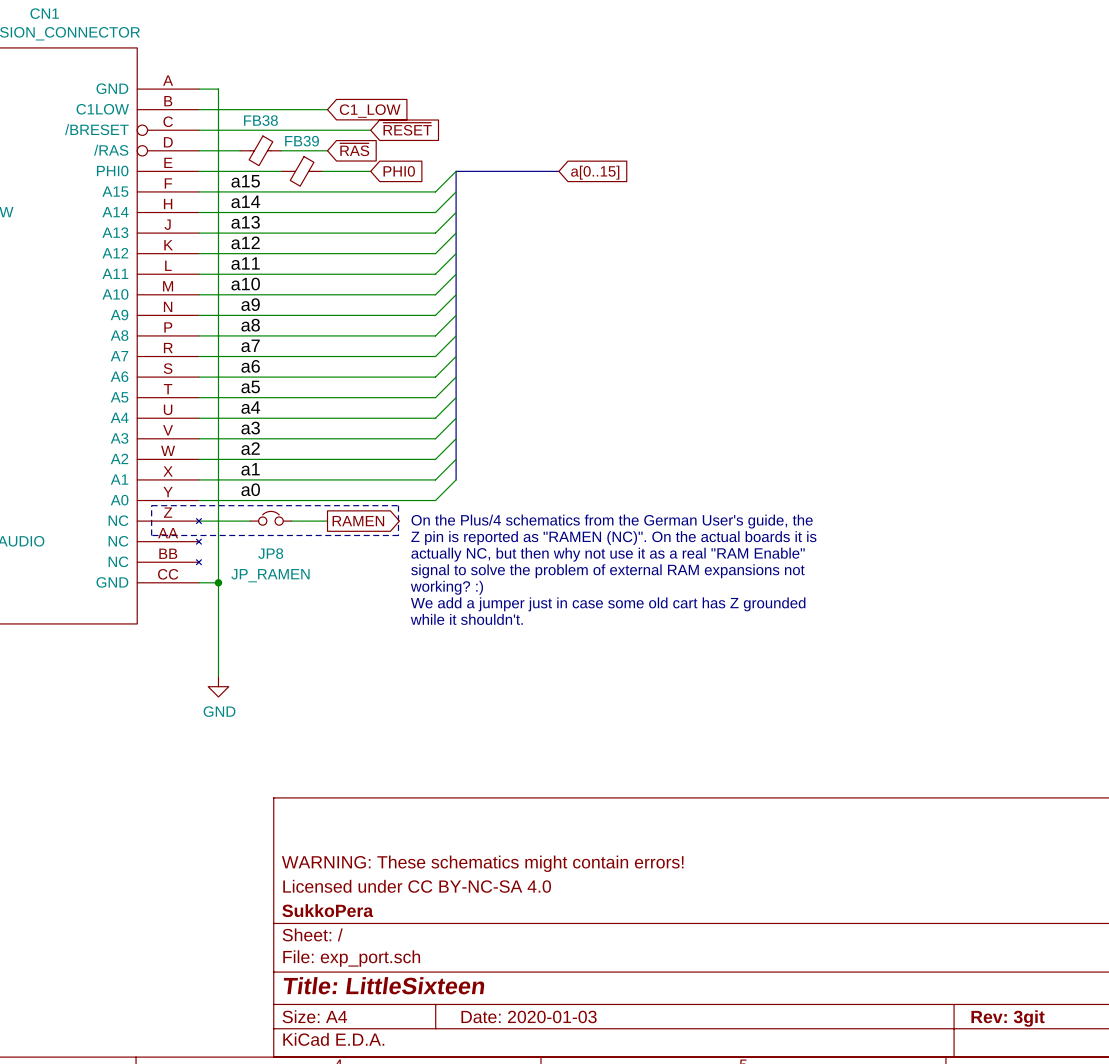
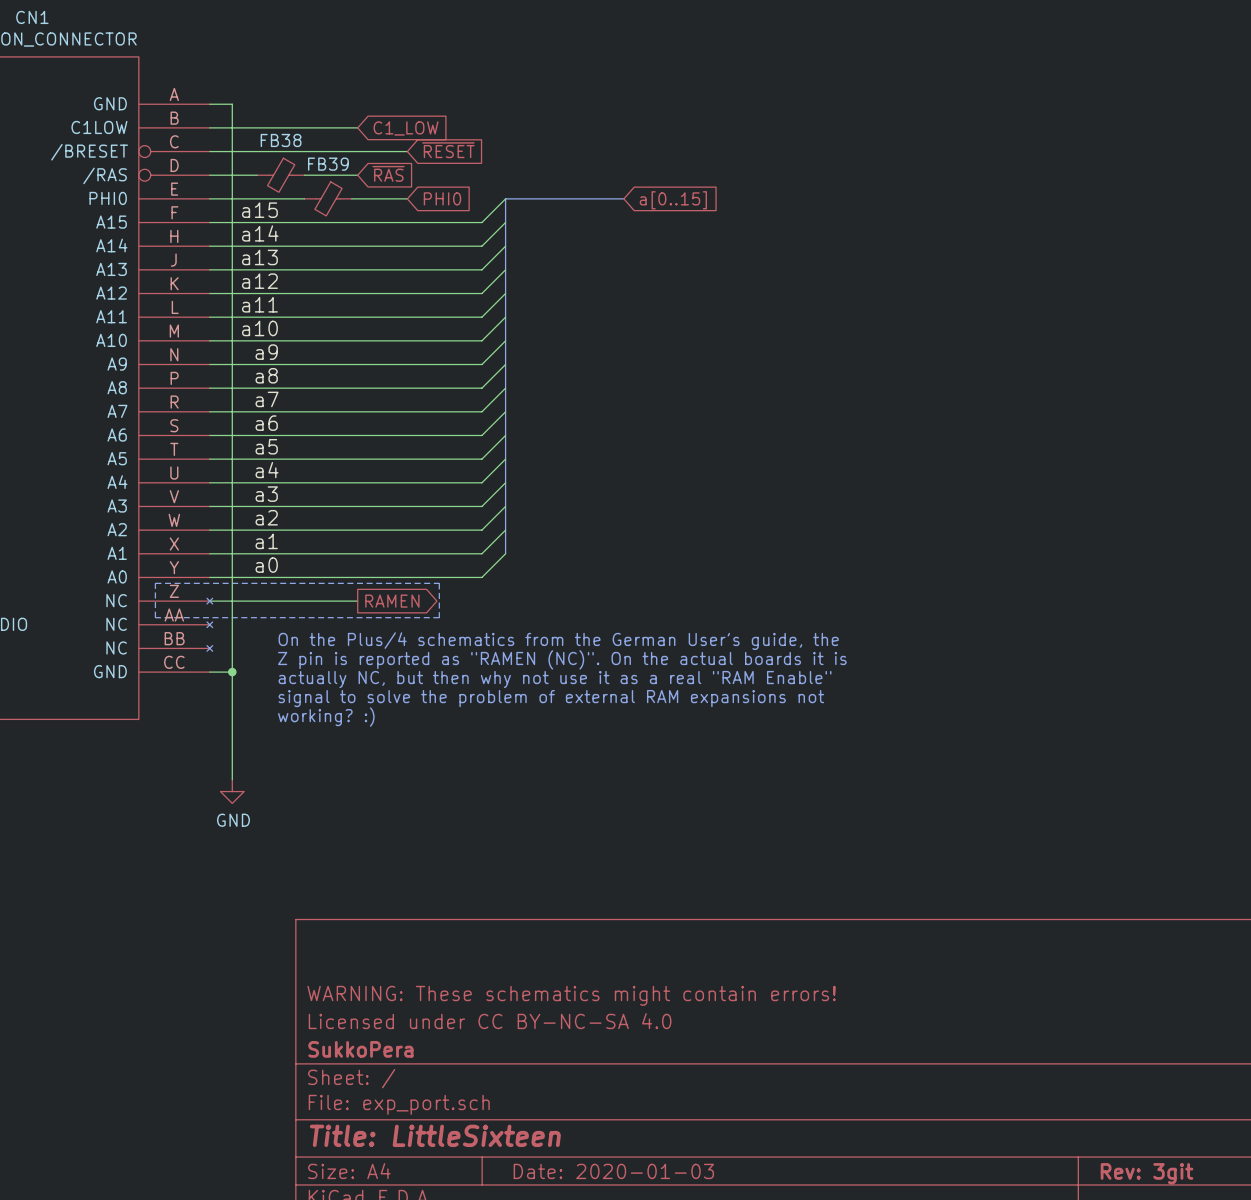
JP8: JP_RAMEN (270, 518) -> none
wire: none -> (268, 601) (316, 601)
text position: On the Plus/4 schematics from the German User's guide, the (612, 521) -> On the Plus/4 schematics from the German User's guide, the (558, 641)
text position: Z pin is reported as "RAMEN (NC)". On the actual boards it is (613, 538) -> Z pin is reported as "RAMEN (NC)". On the actual boards it is (562, 659)
text position: actually NC, but then why not use it as a real "RAM Enable" (608, 554) -> actually NC, but then why not use it as a real "RAM Enable" (555, 679)
text position: signal to solve the problem of external RAM expansions not (607, 571) -> signal to solve the problem of external RAM expansions not (551, 698)
text position: working? :) (446, 587) -> working? :) (326, 717)
text: We add a jumper just in case some old cart has Z grounded (608, 604) -> none
text: while it shouldn't. (466, 619) -> none

